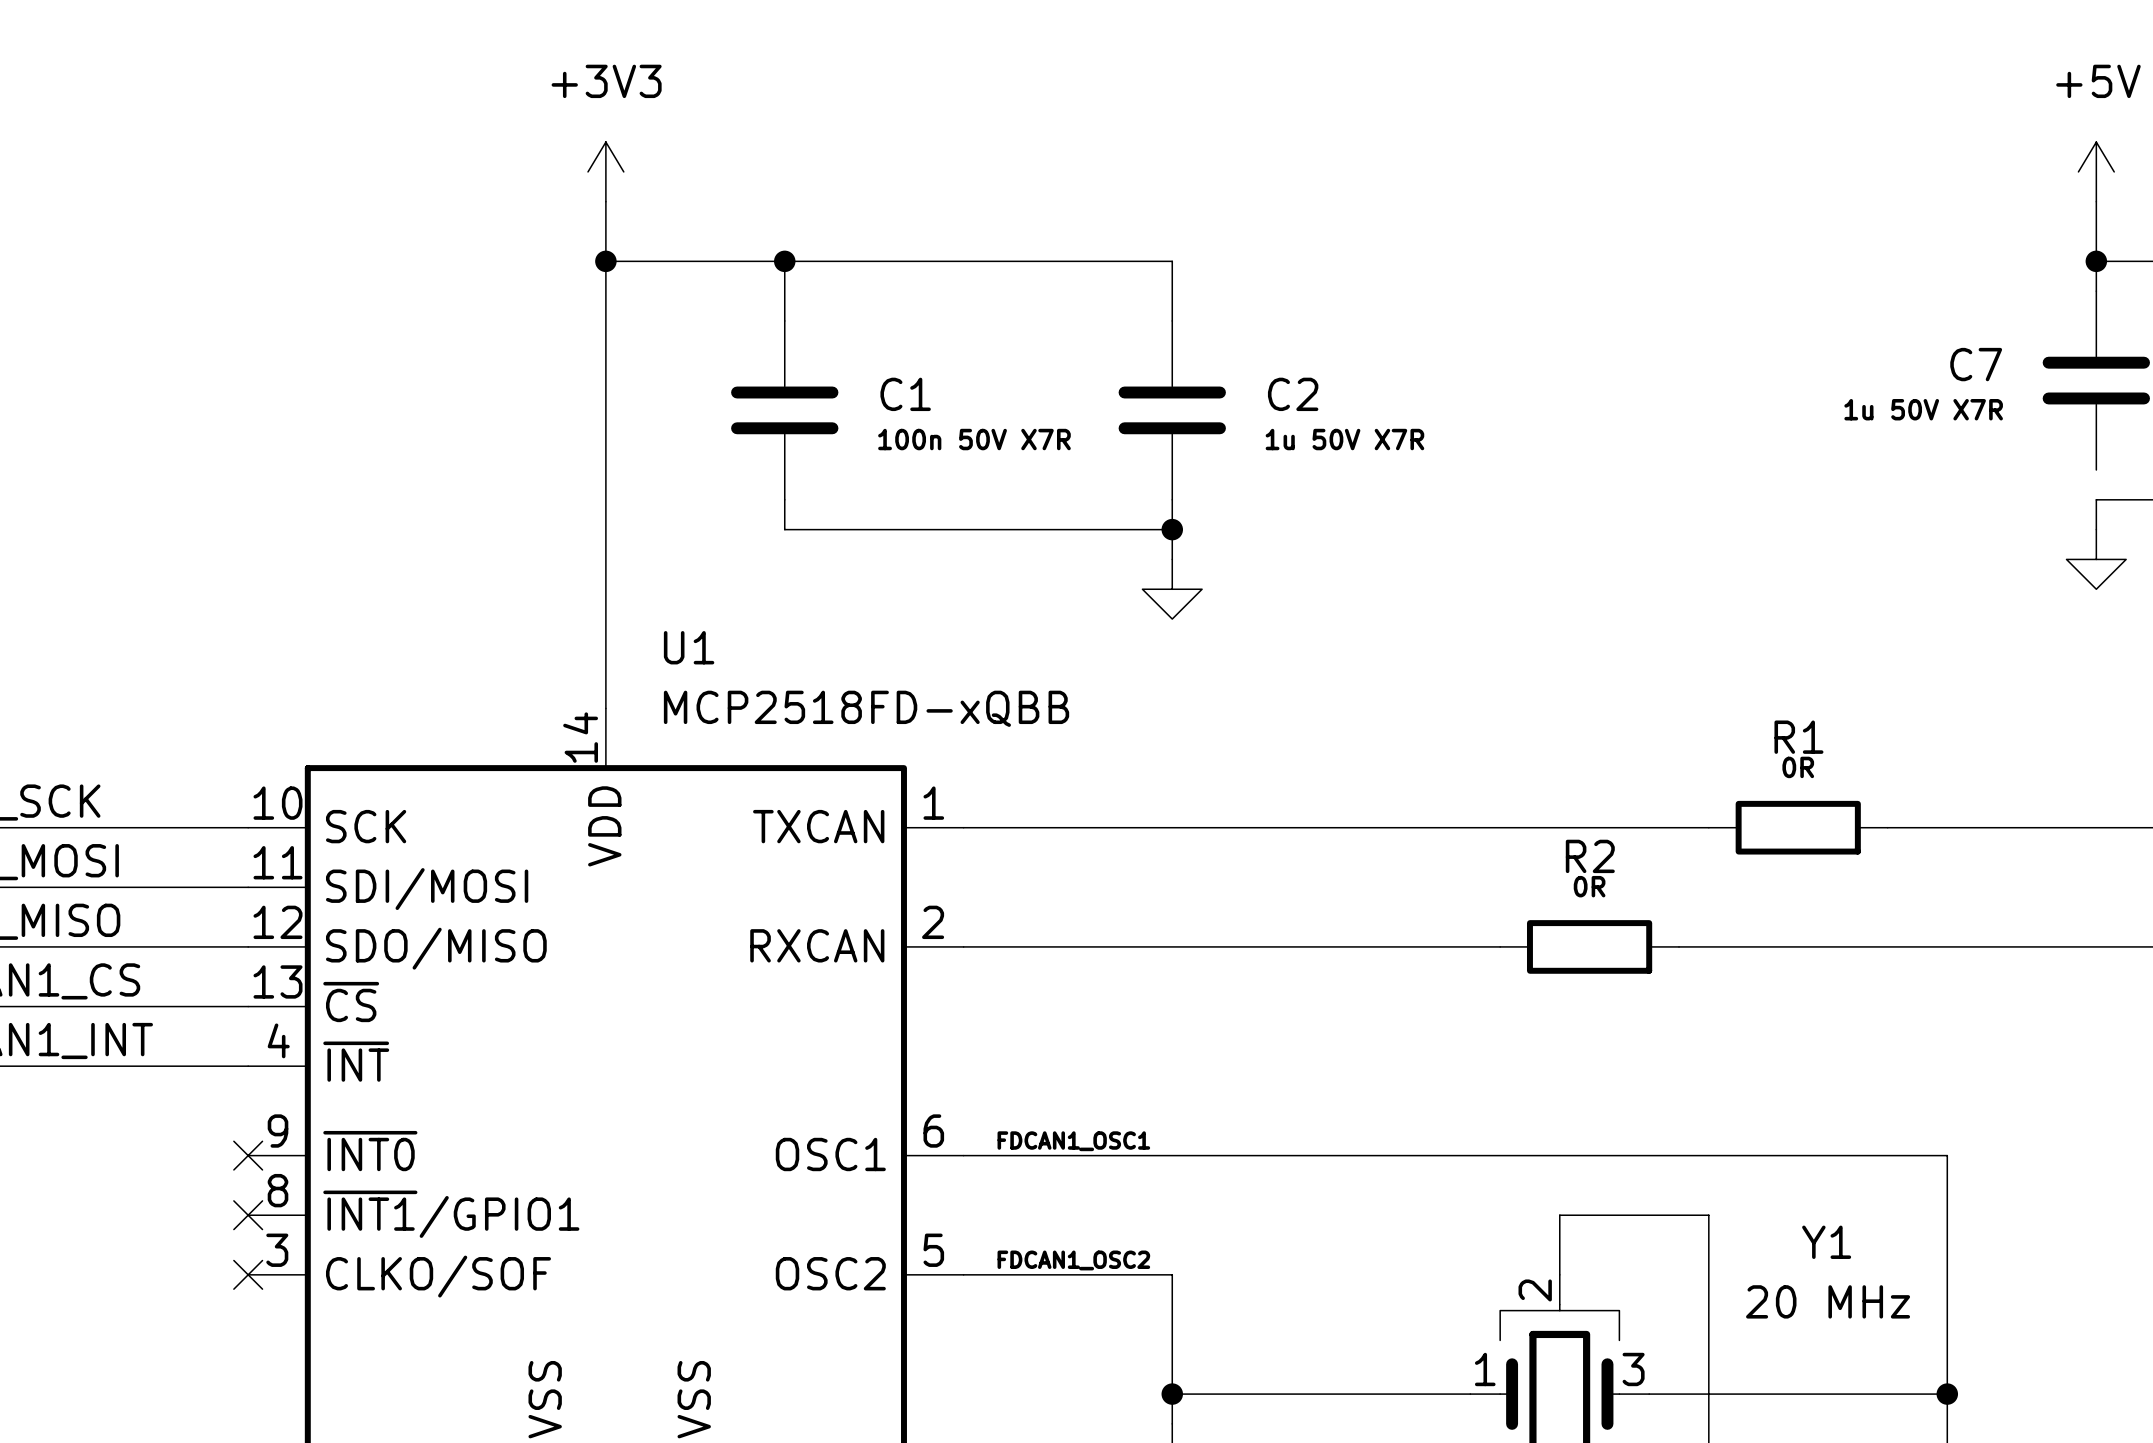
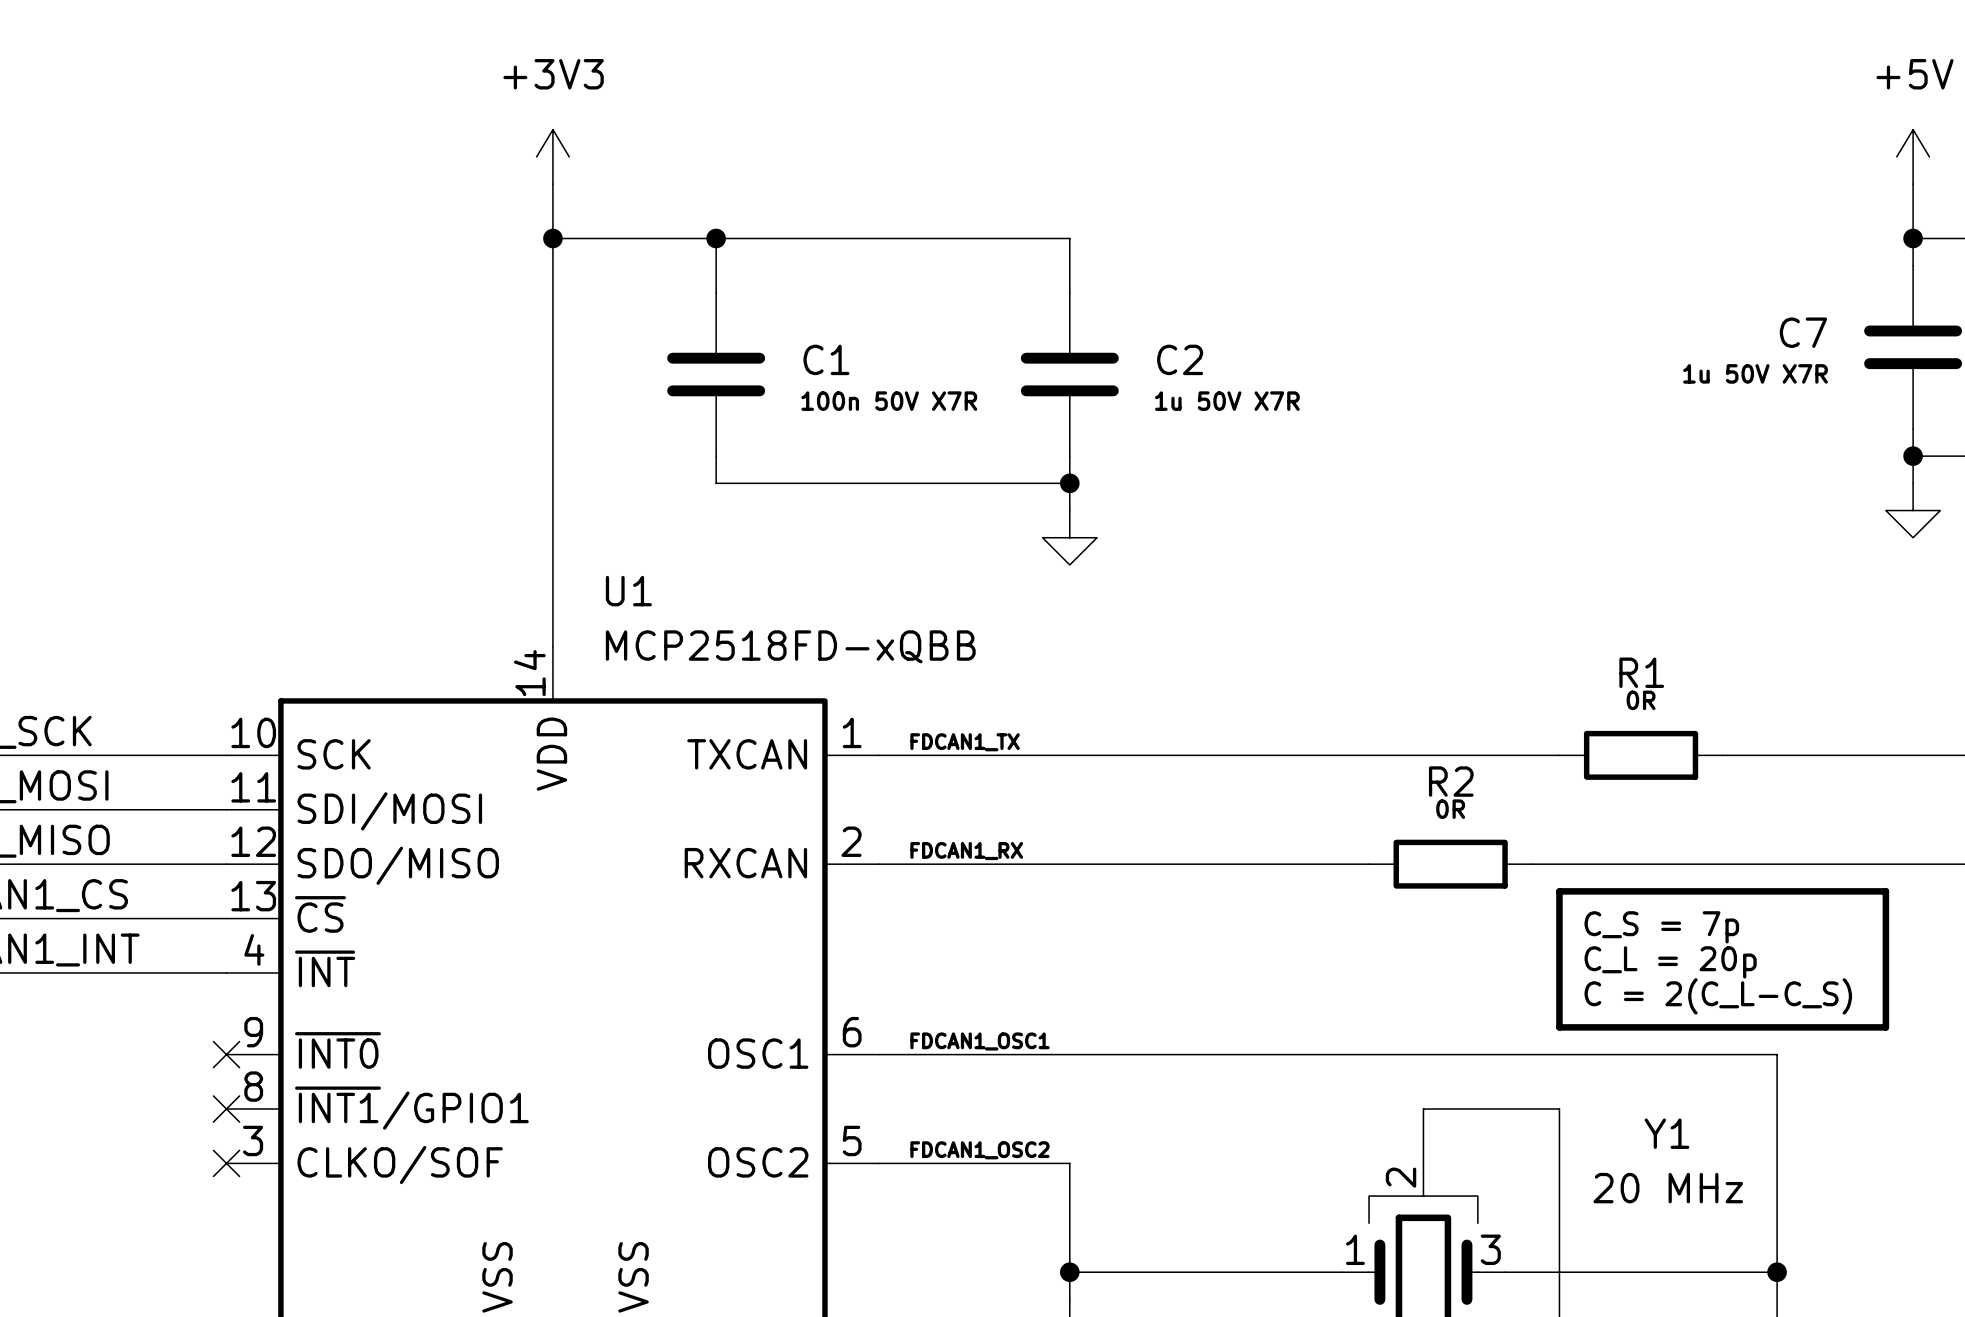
wire: none -> (1913, 428) (1913, 456)
junction: none -> (1913, 456)
label: none -> FDCAN1_TX (965, 742)
label: none -> FDCAN1_RX (966, 851)
line: none -> (1559, 891) (1885, 891) (1885, 1027) (1559, 1027) (1559, 891)
text: none -> C_S = 7p (1661, 927)
text: none -> C_L = 20p (1670, 962)
text: none -> C = 2(C_L-C_S) (1718, 996)

